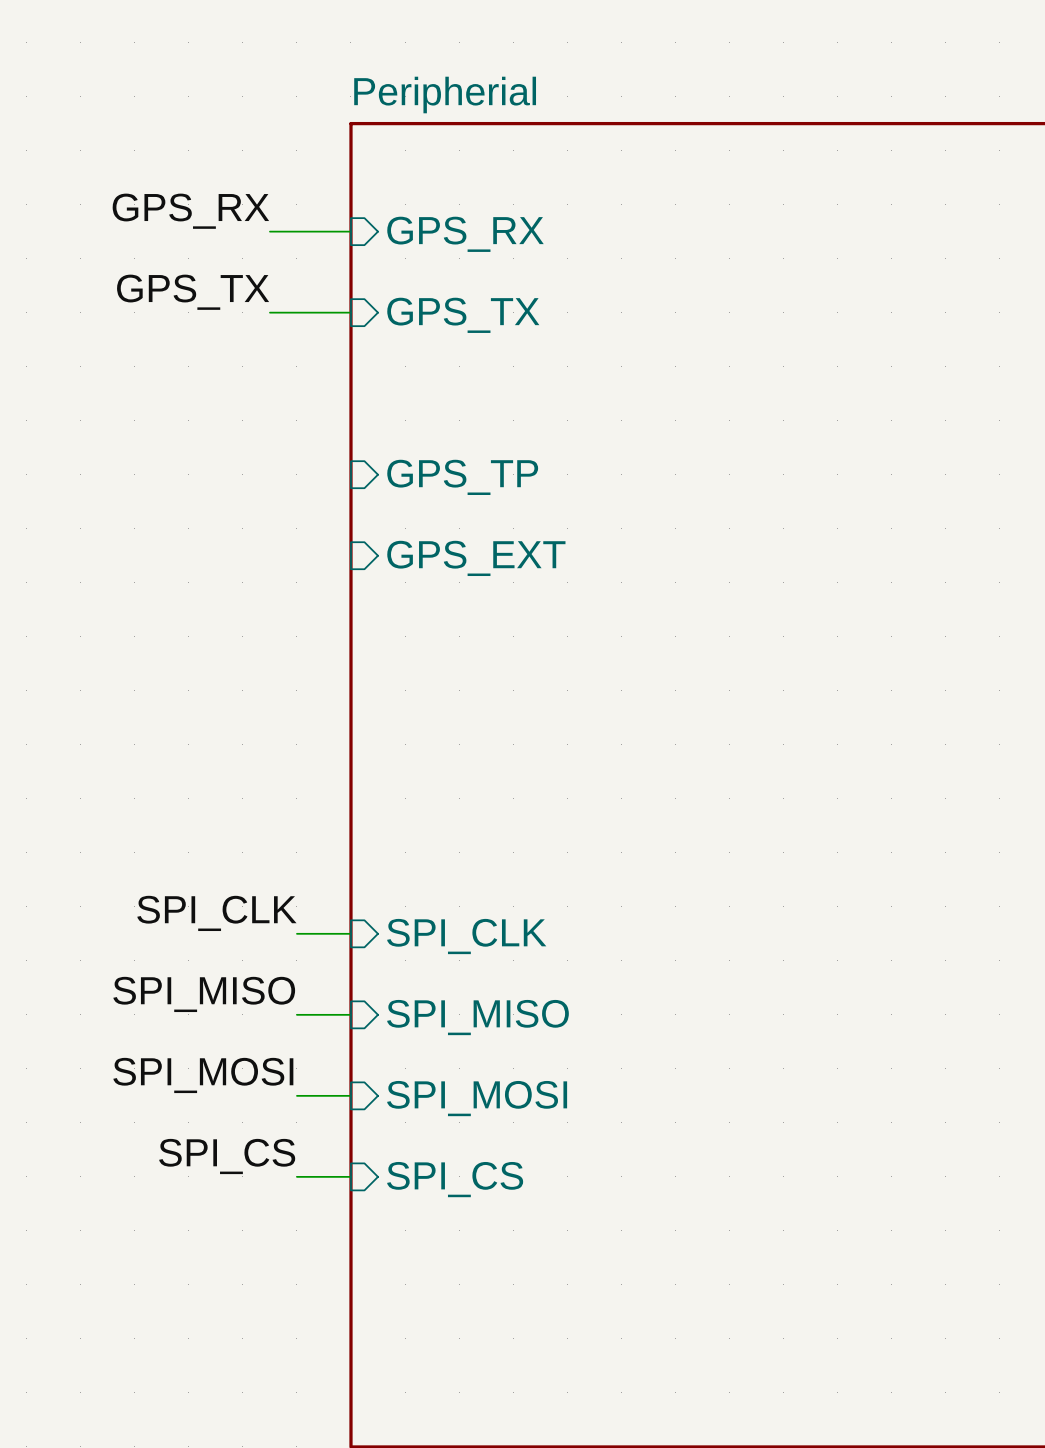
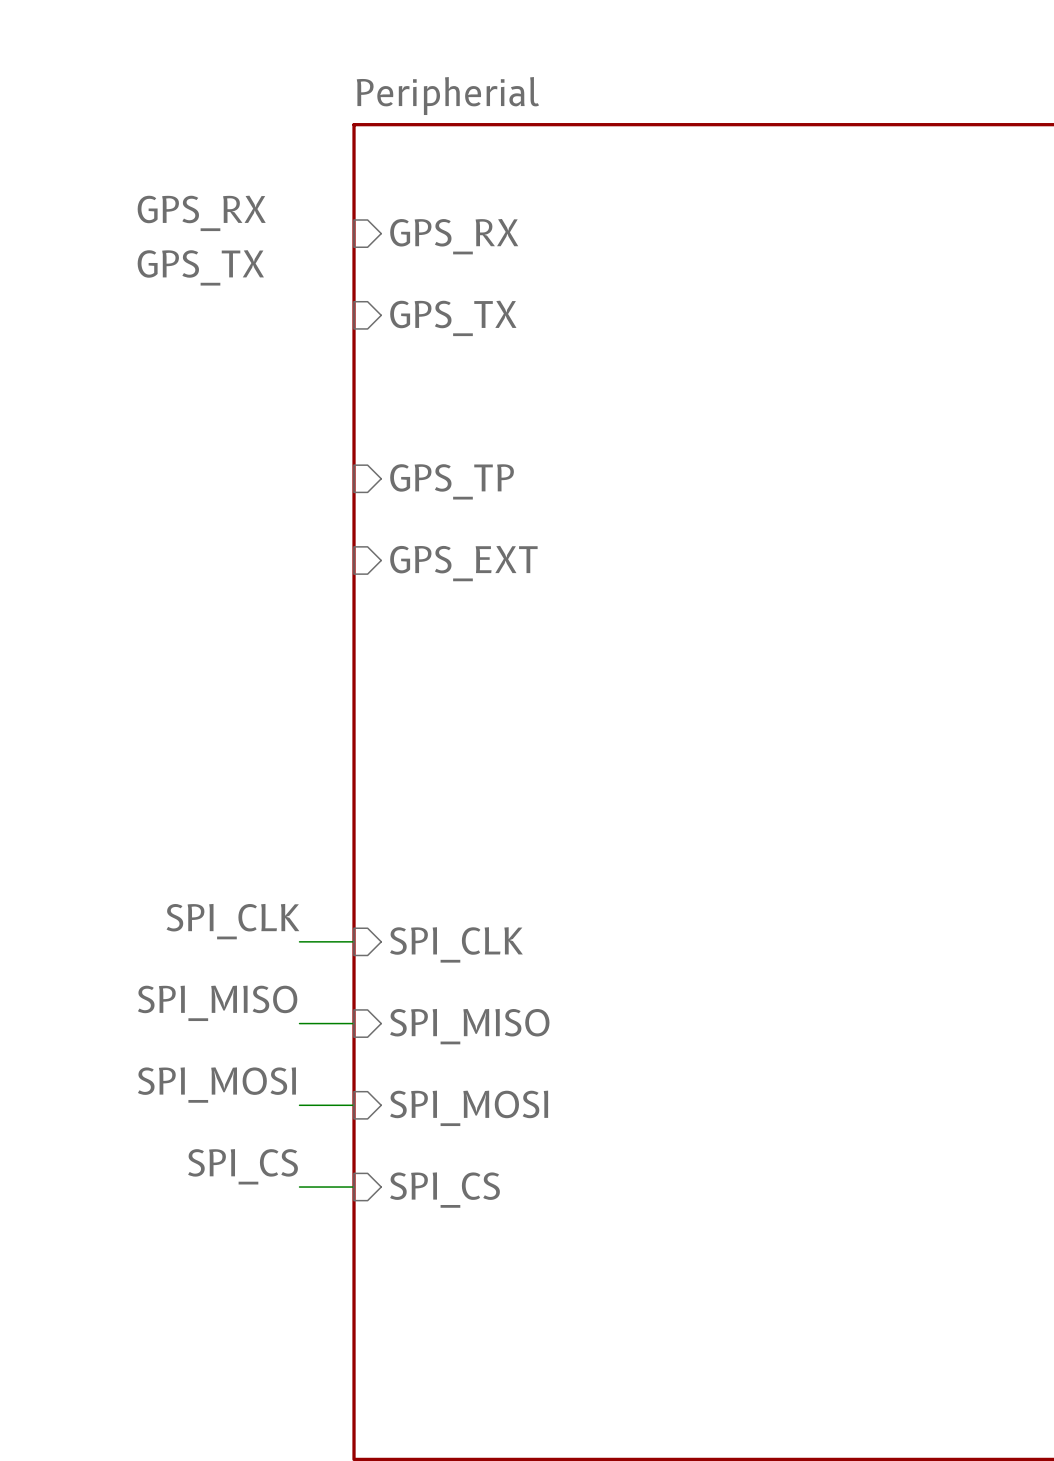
label position: GPS_RX (190, 211) -> GPS_RX (201, 213)
wire: (269, 231) (350, 231) -> none
label position: GPS_TX (193, 292) -> GPS_TX (200, 267)
wire: (269, 312) (350, 312) -> none

